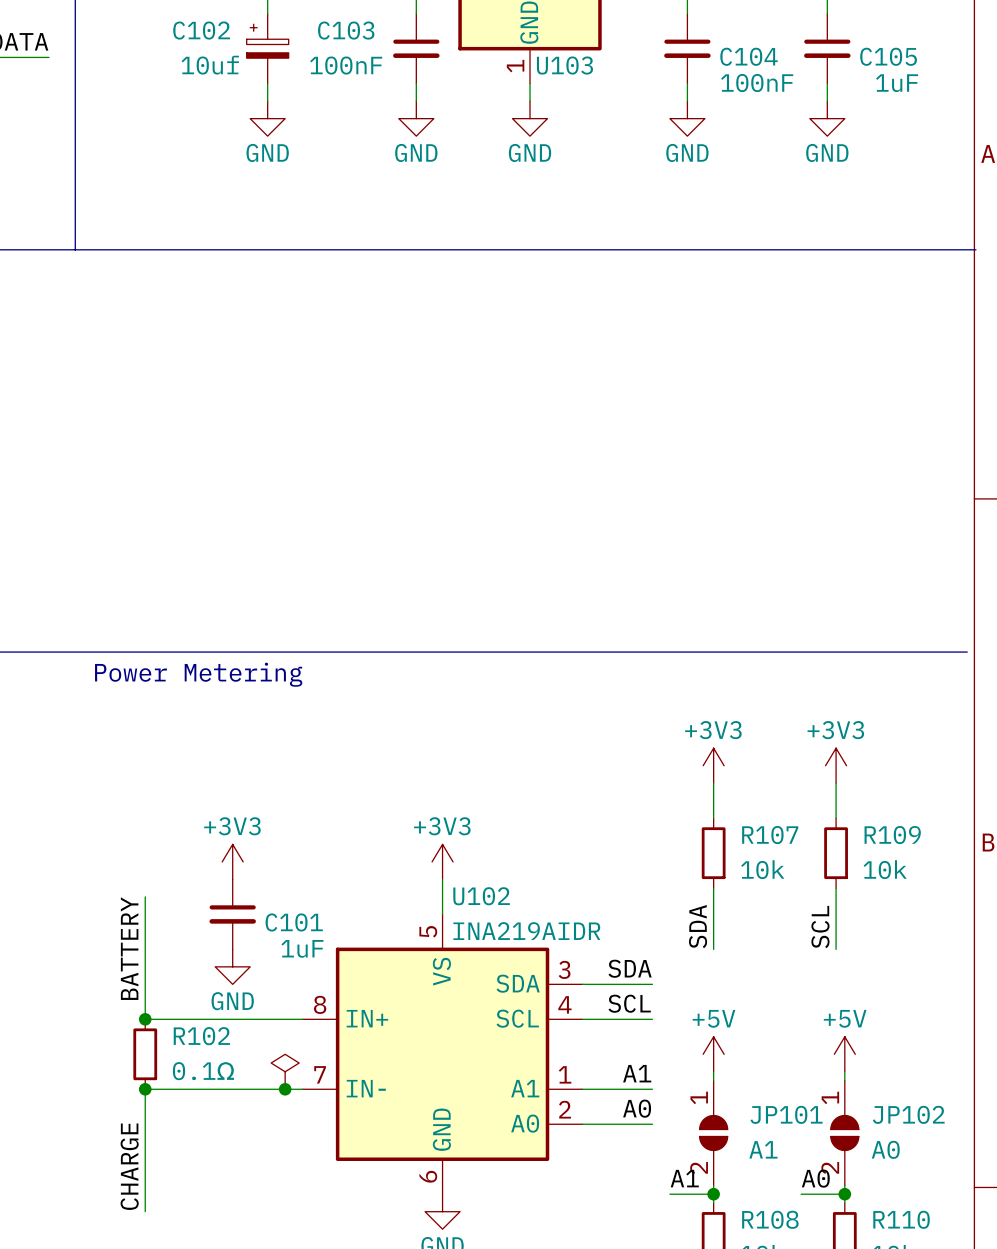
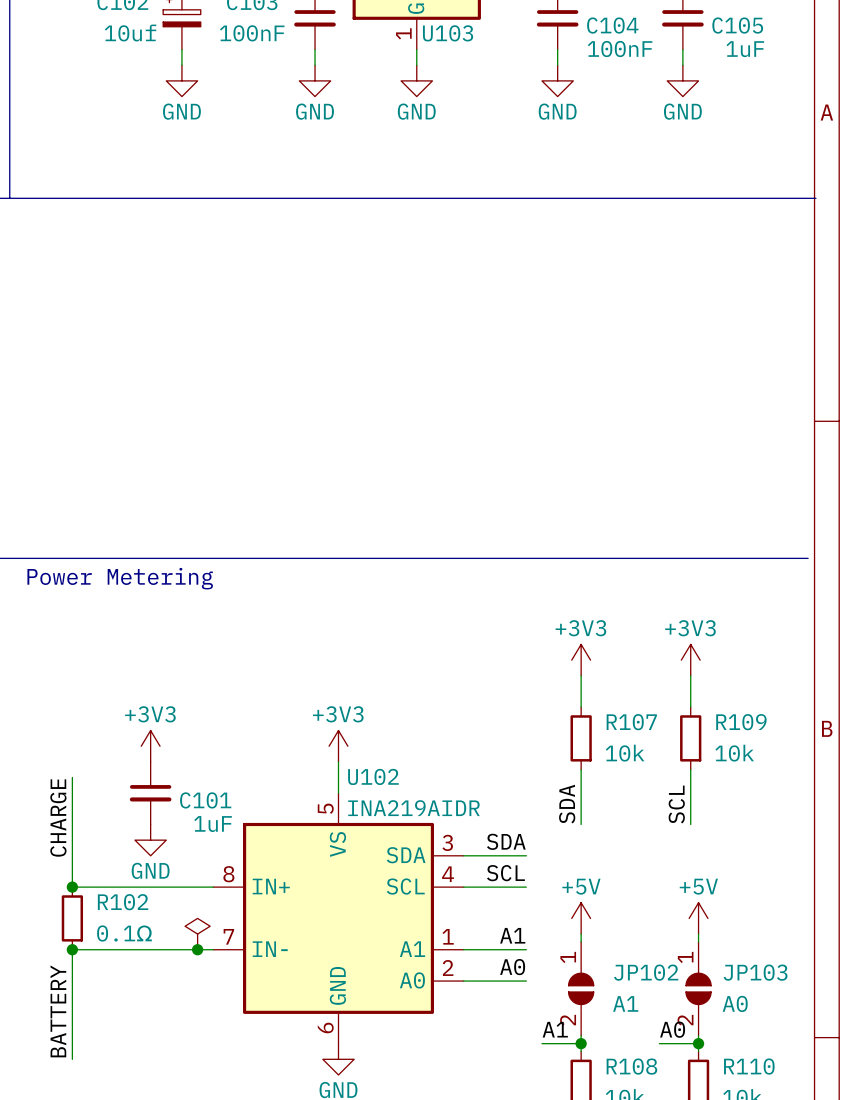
label: BATTERY (129, 948) -> CHARGE (58, 818)
JP101 name: JP101 (786, 1114) -> JP102 (646, 972)
JP102 name: JP102 (908, 1114) -> JP103 (755, 972)
label: CHARGE (129, 1166) -> BATTERY (58, 1011)

